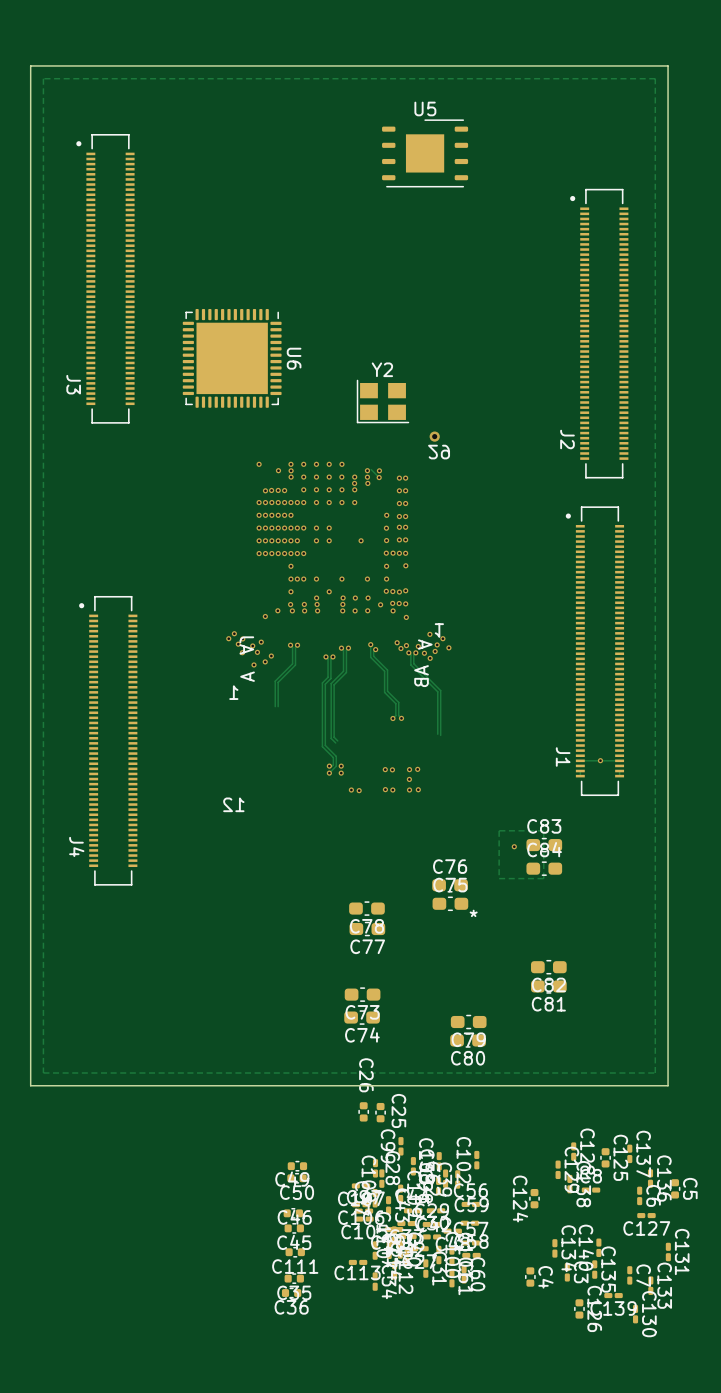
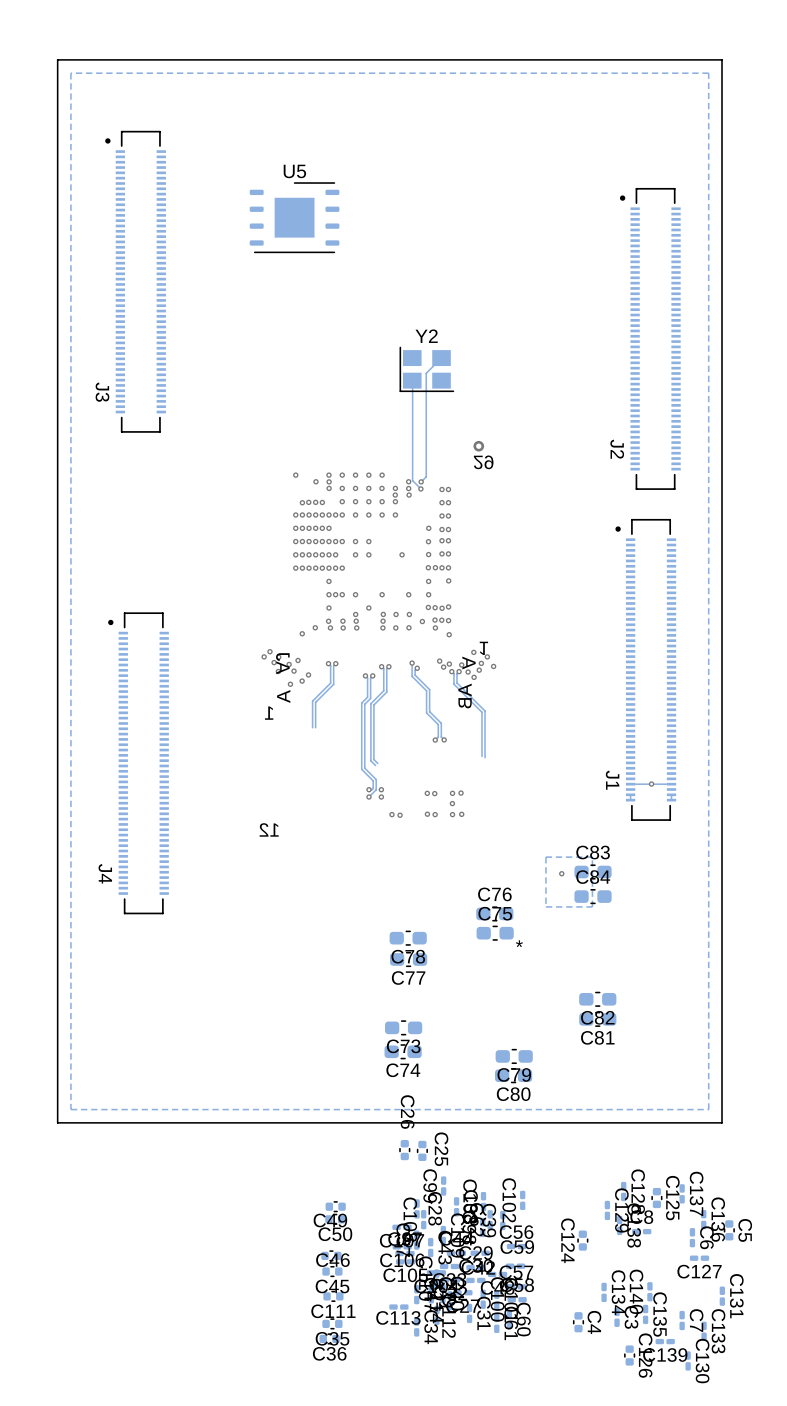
U5 position: (425, 153) -> (294, 217)
track: none -> (441, 358) (426, 373) (426, 476) (421, 481)
U6: (232, 358) -> none
track: none -> (412, 380) (412, 480)
Y2 position: (383, 401) -> (426, 369)

